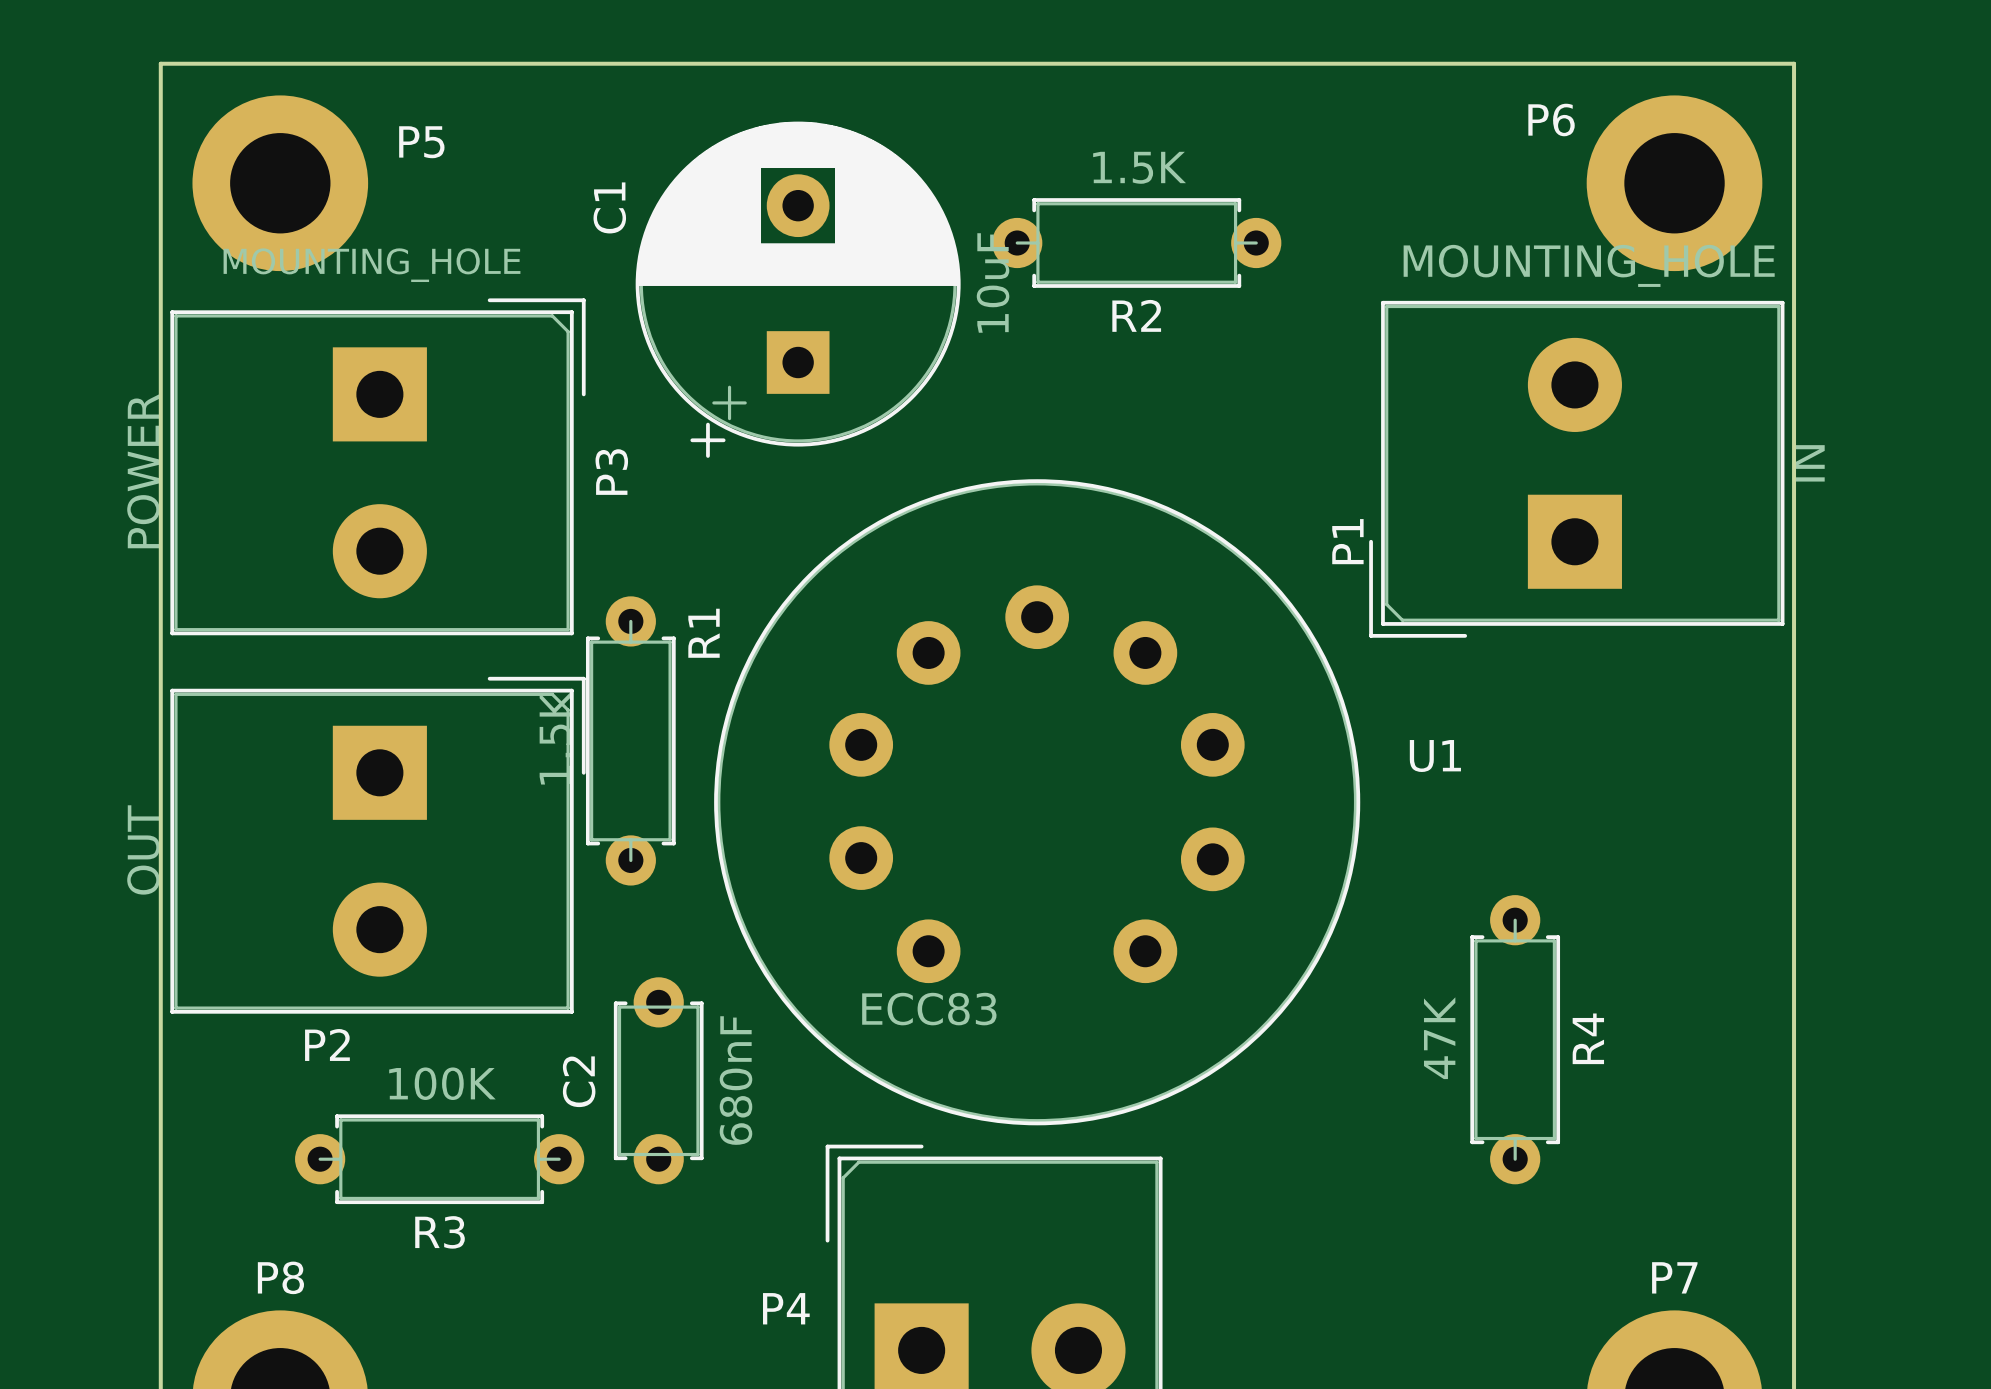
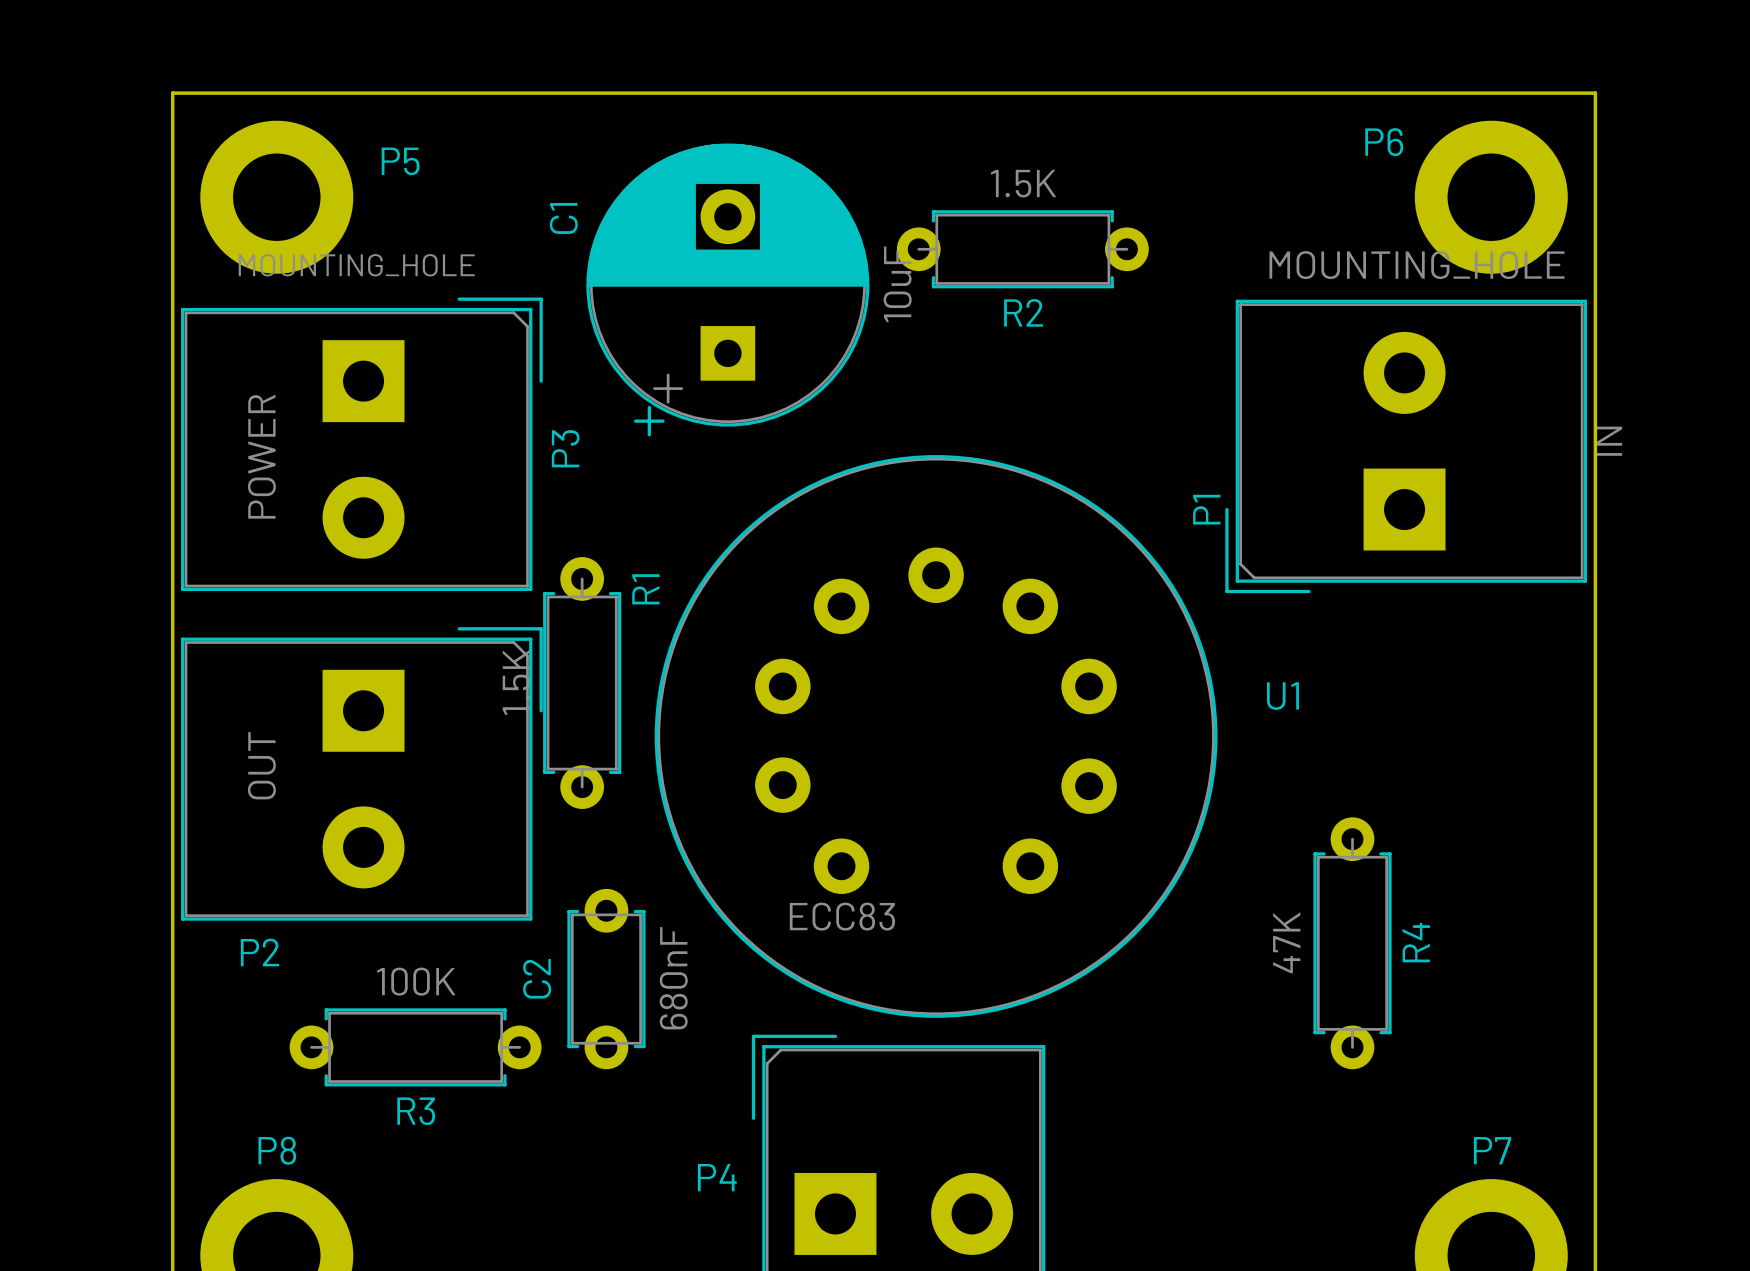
P3 value position: POWER (143, 471) -> POWER (261, 456)
P2 value position: OUT (143, 849) -> OUT (261, 765)
P2 name position: P2 (327, 1044) -> P2 (260, 952)

